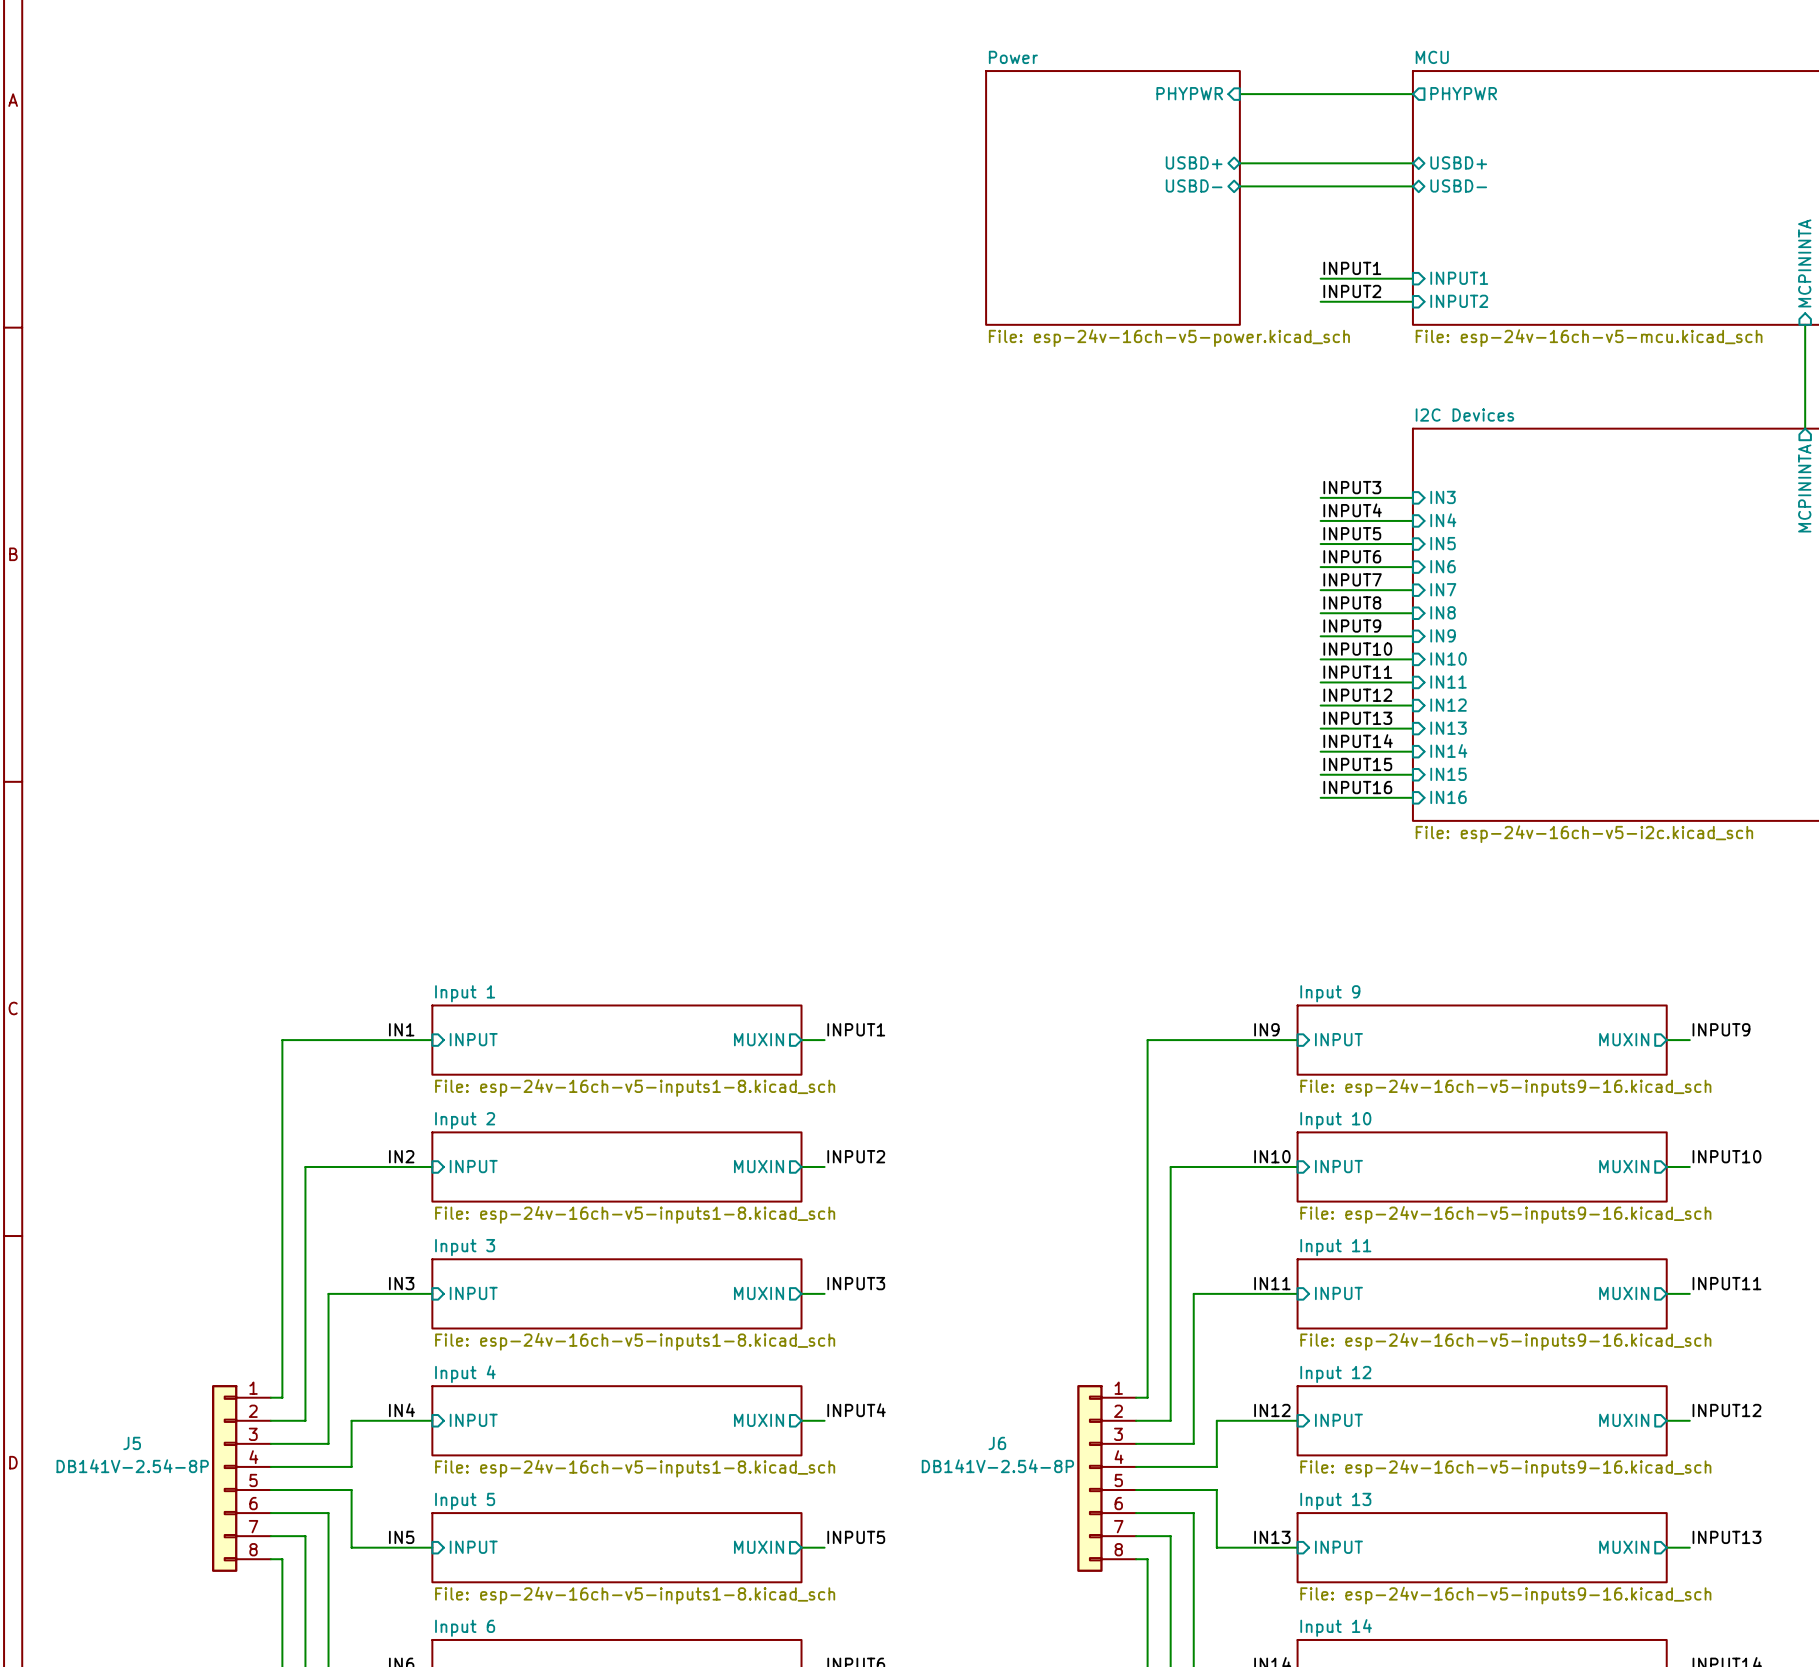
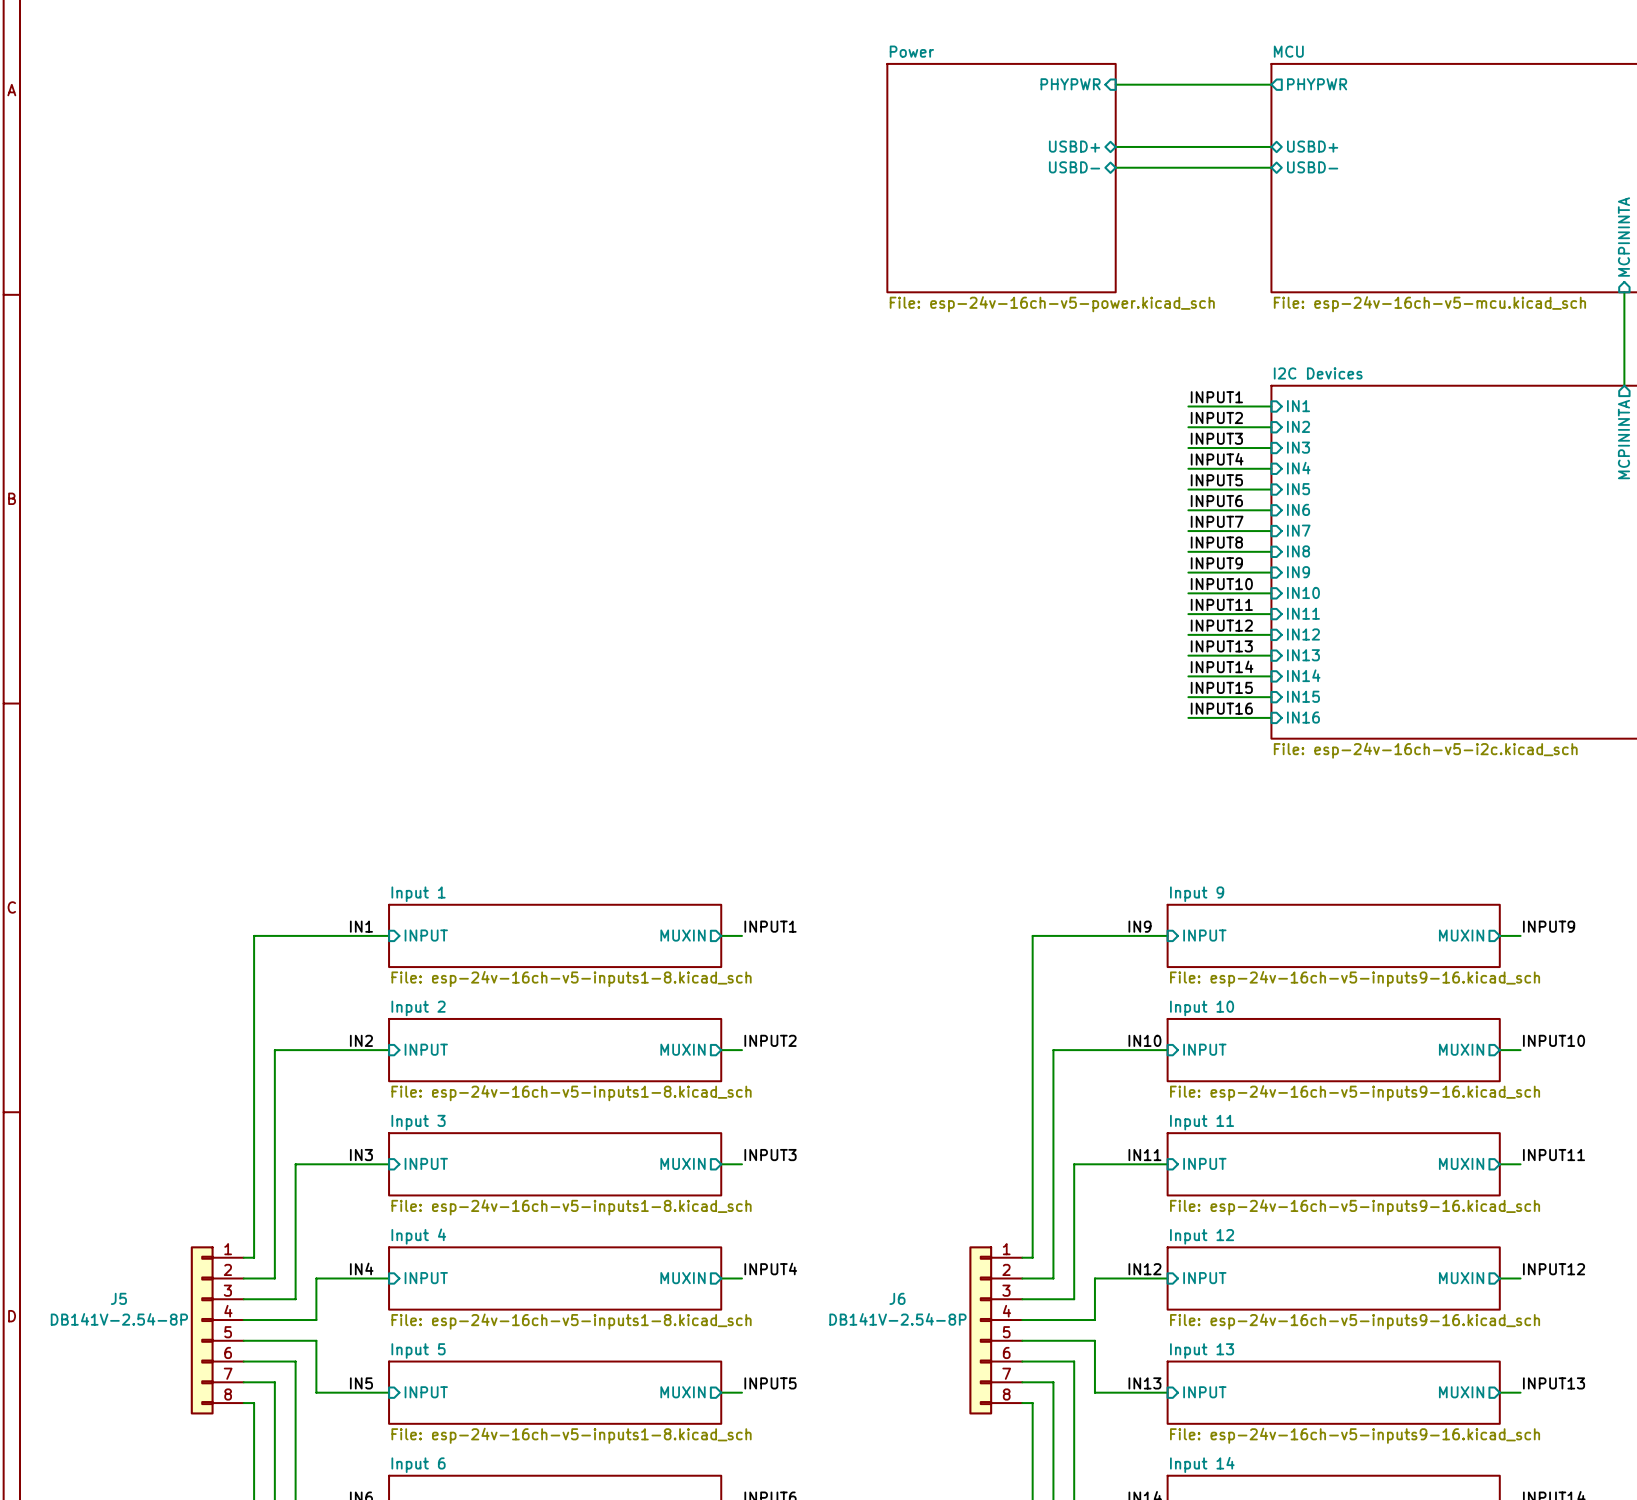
label position: INPUT1 (1352, 268) -> INPUT1 (1216, 397)
wire: (1320, 278) (1412, 278) -> (1188, 427) (1271, 427)
sheet pin: INPUT1 (1459, 278) -> none
label position: INPUT2 (1352, 291) -> INPUT2 (1216, 417)
wire: (1320, 301) (1412, 301) -> (1188, 406) (1271, 406)
sheet pin: INPUT2 (1459, 301) -> none
sheet pin: none -> IN1 (1298, 406)
sheet pin: none -> IN2 (1298, 426)

